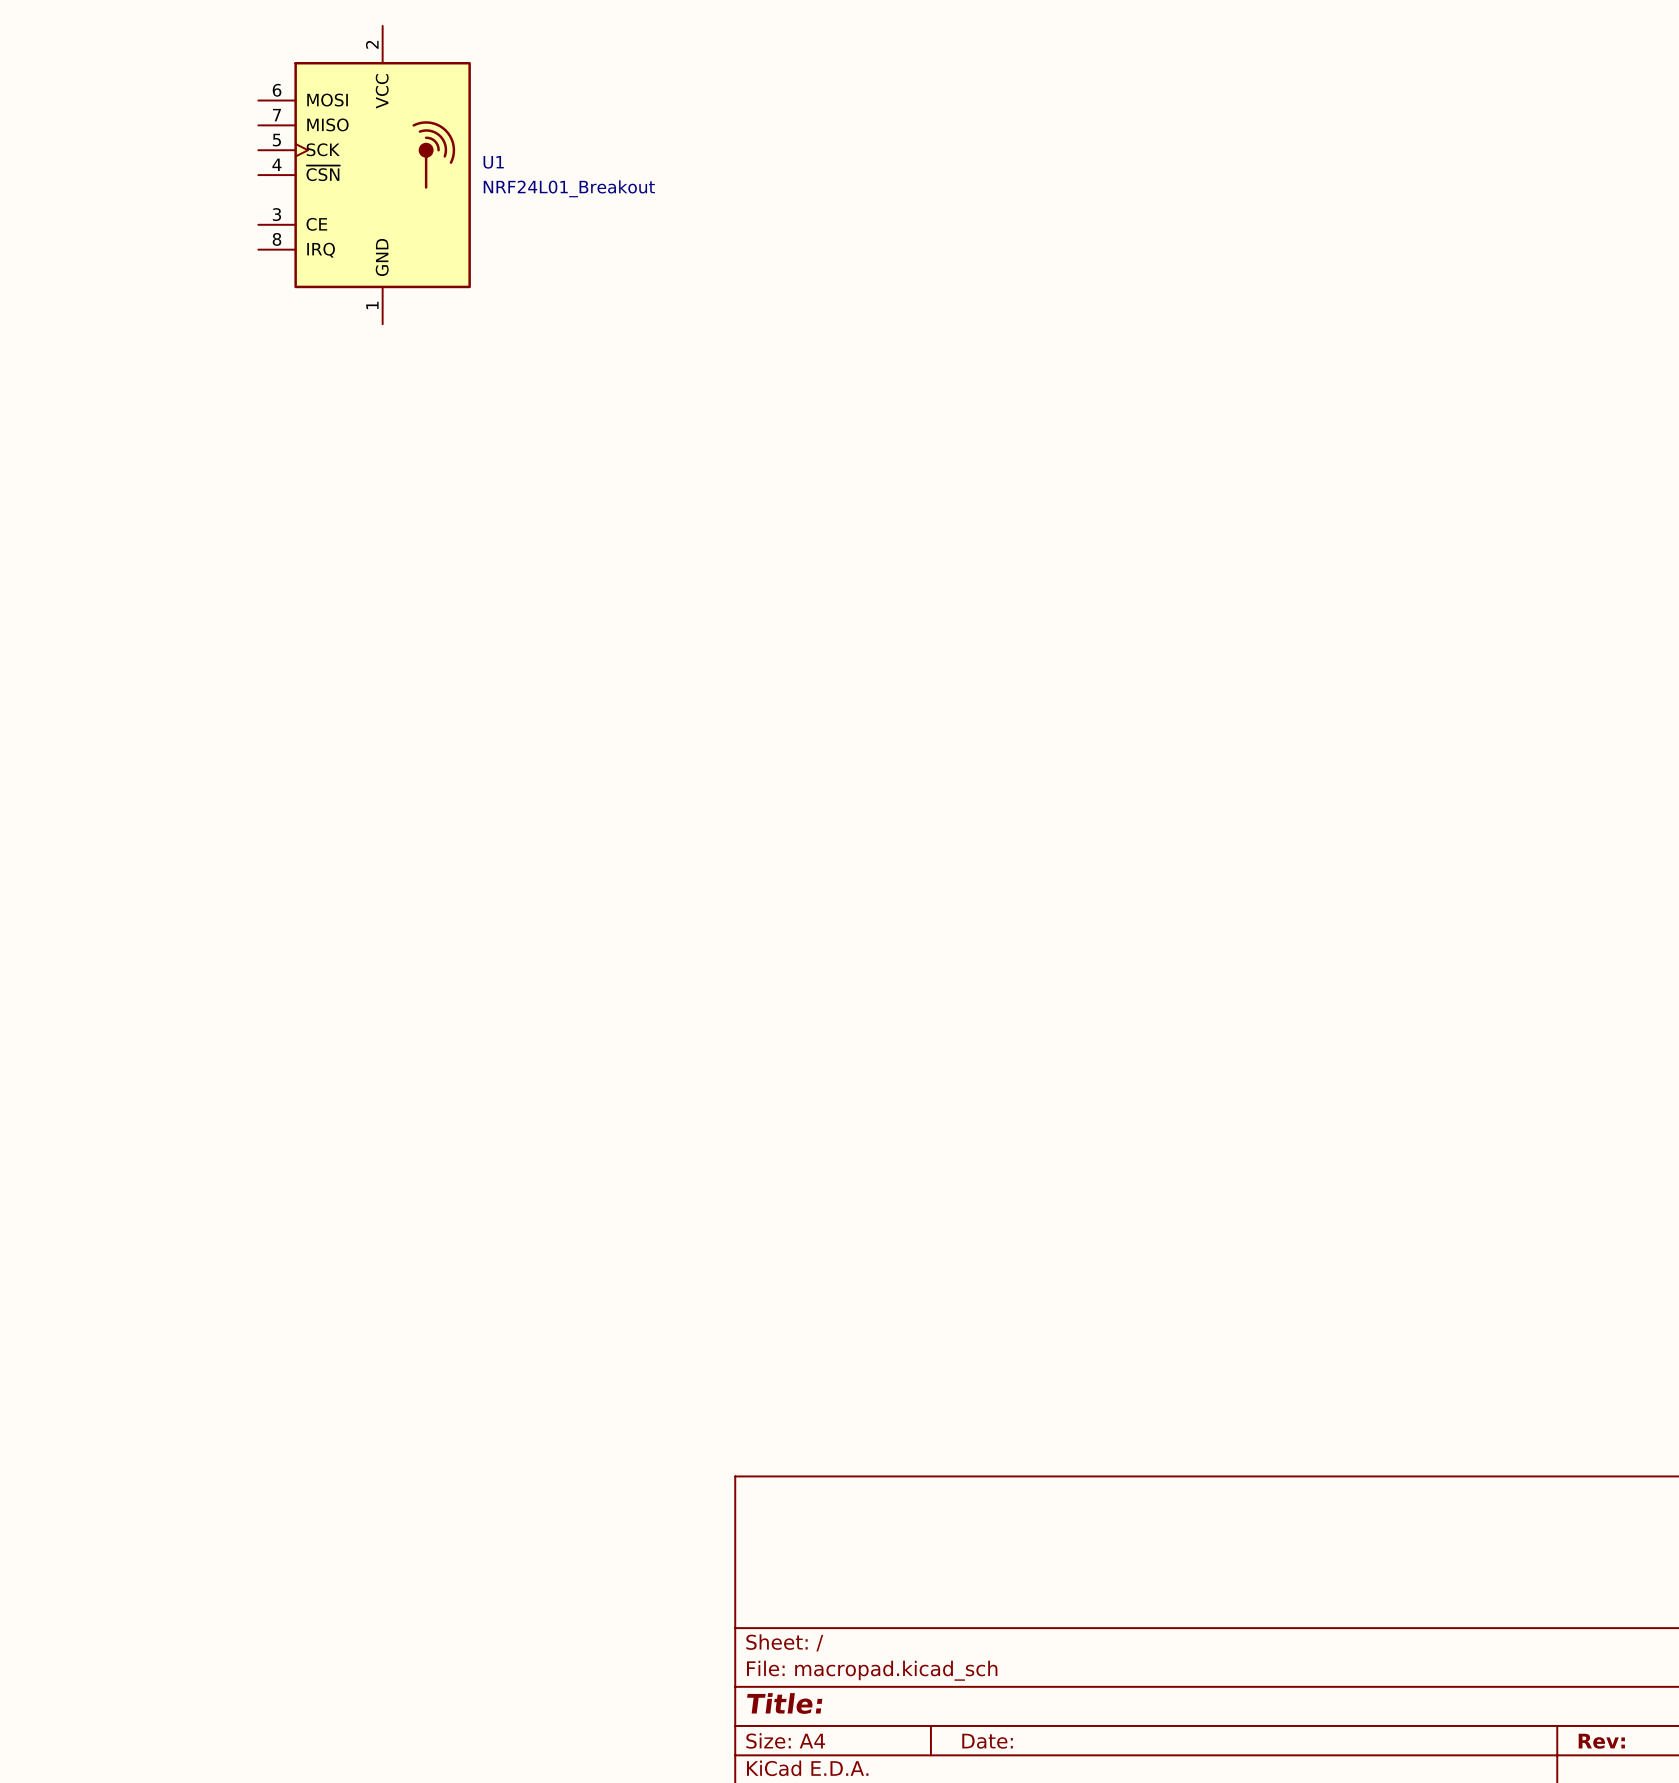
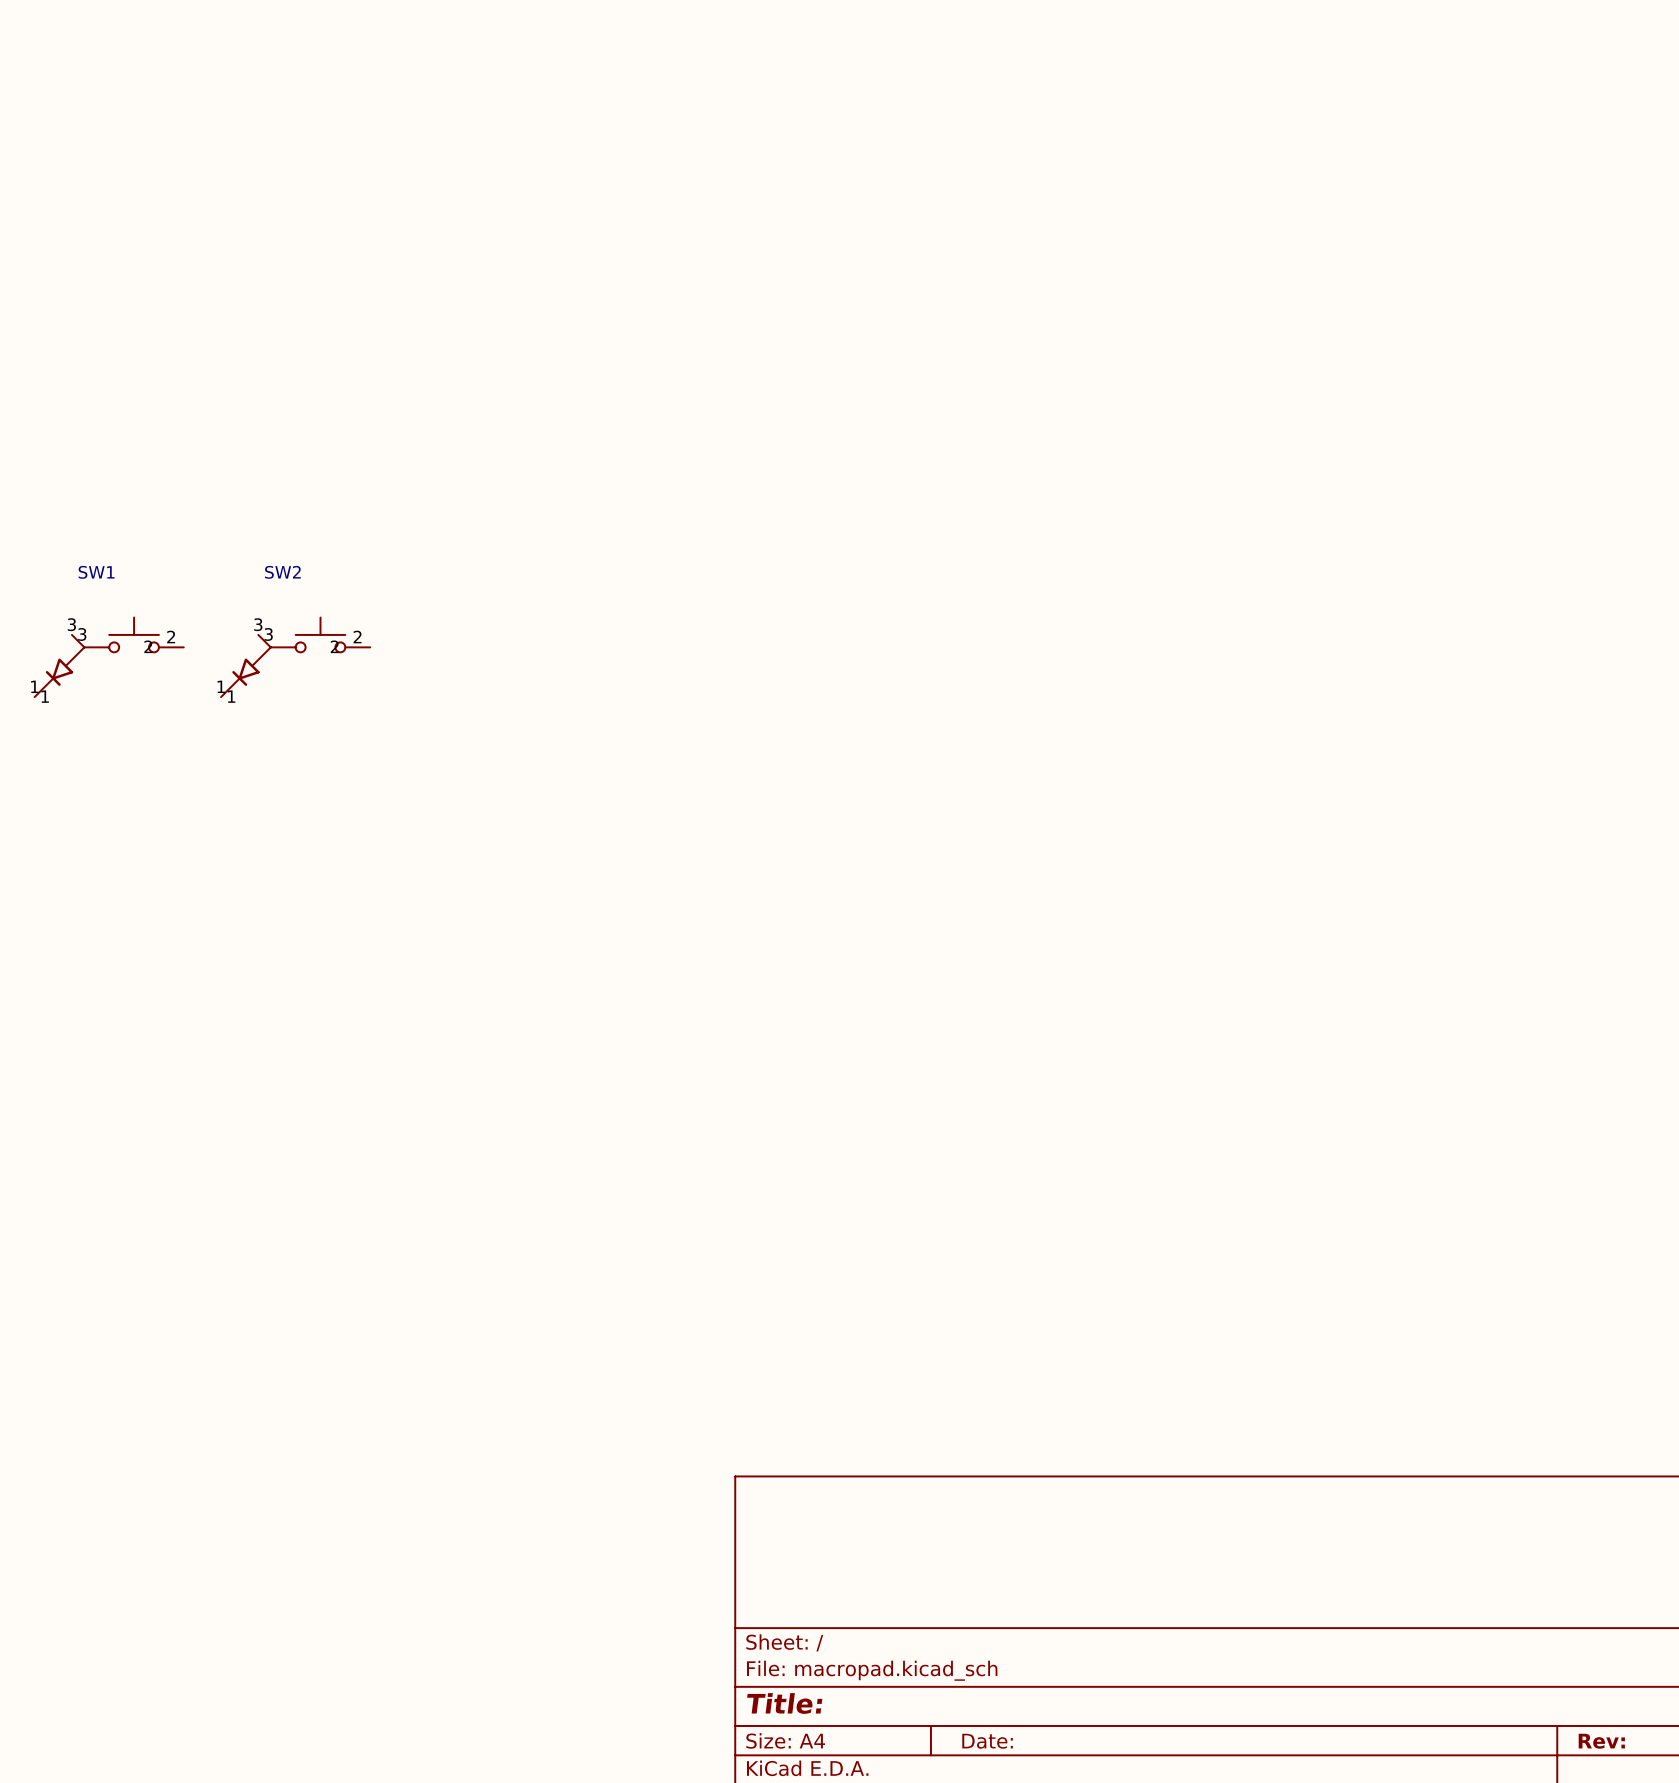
U1: NRF24L01_Breakout (364, 175) -> none
SW1: none -> (109, 657)
SW2: none -> (295, 657)

